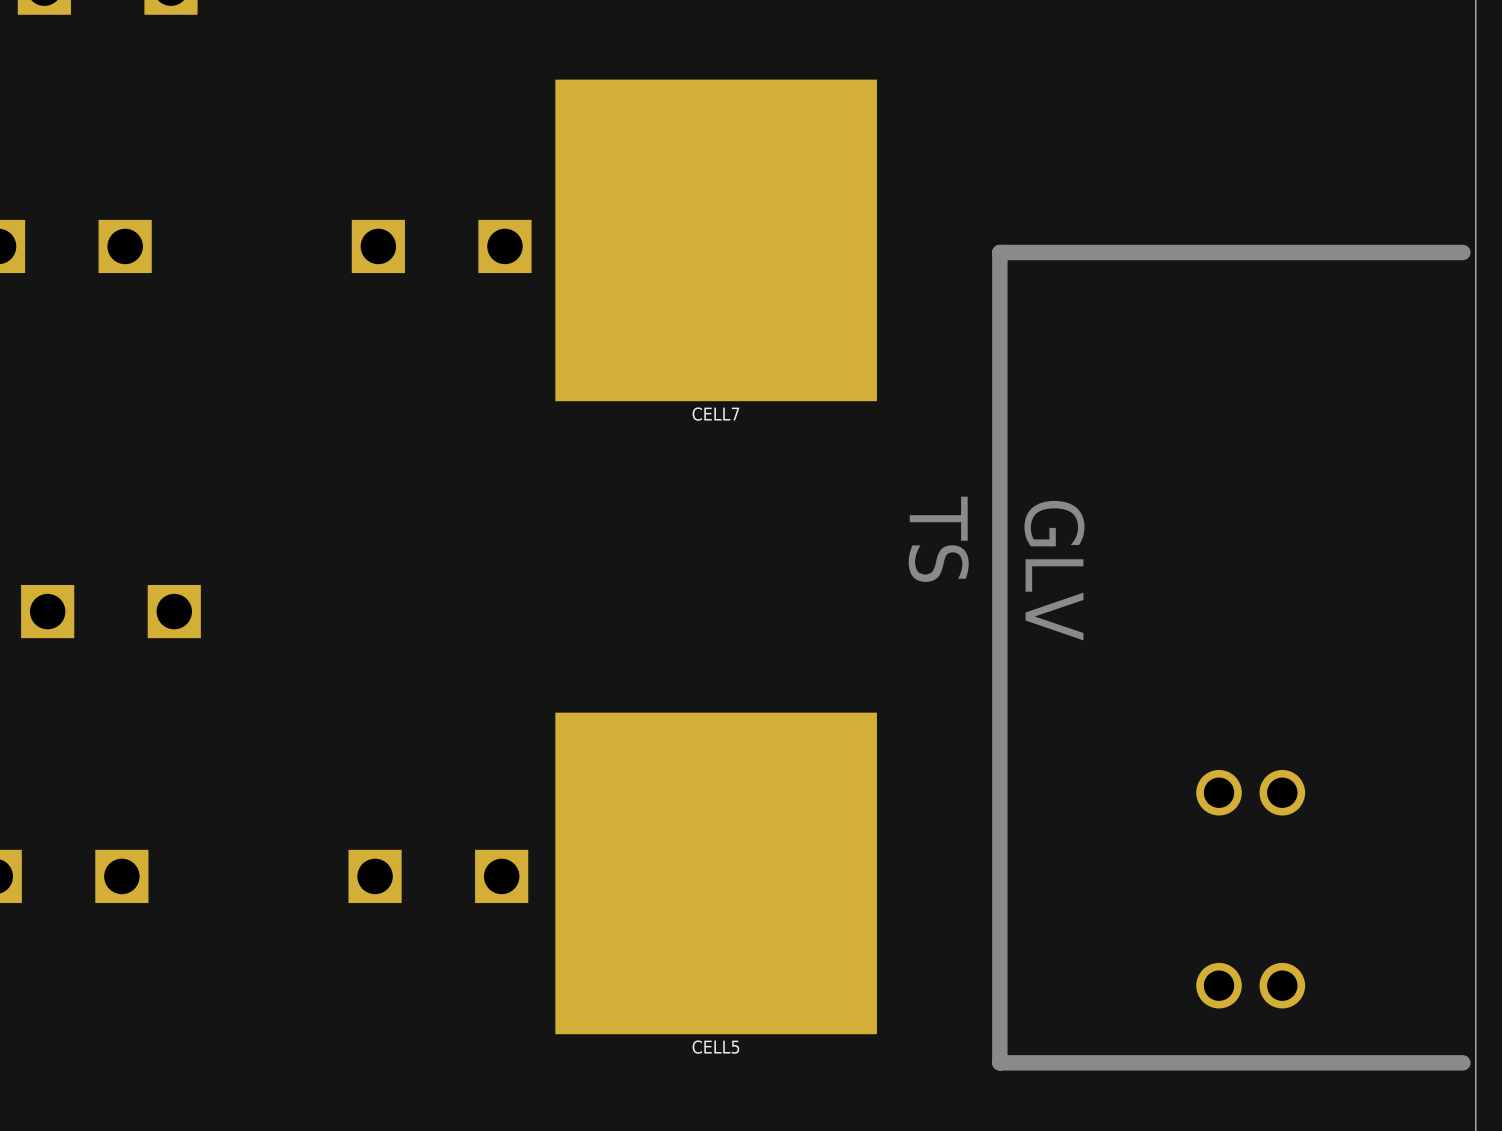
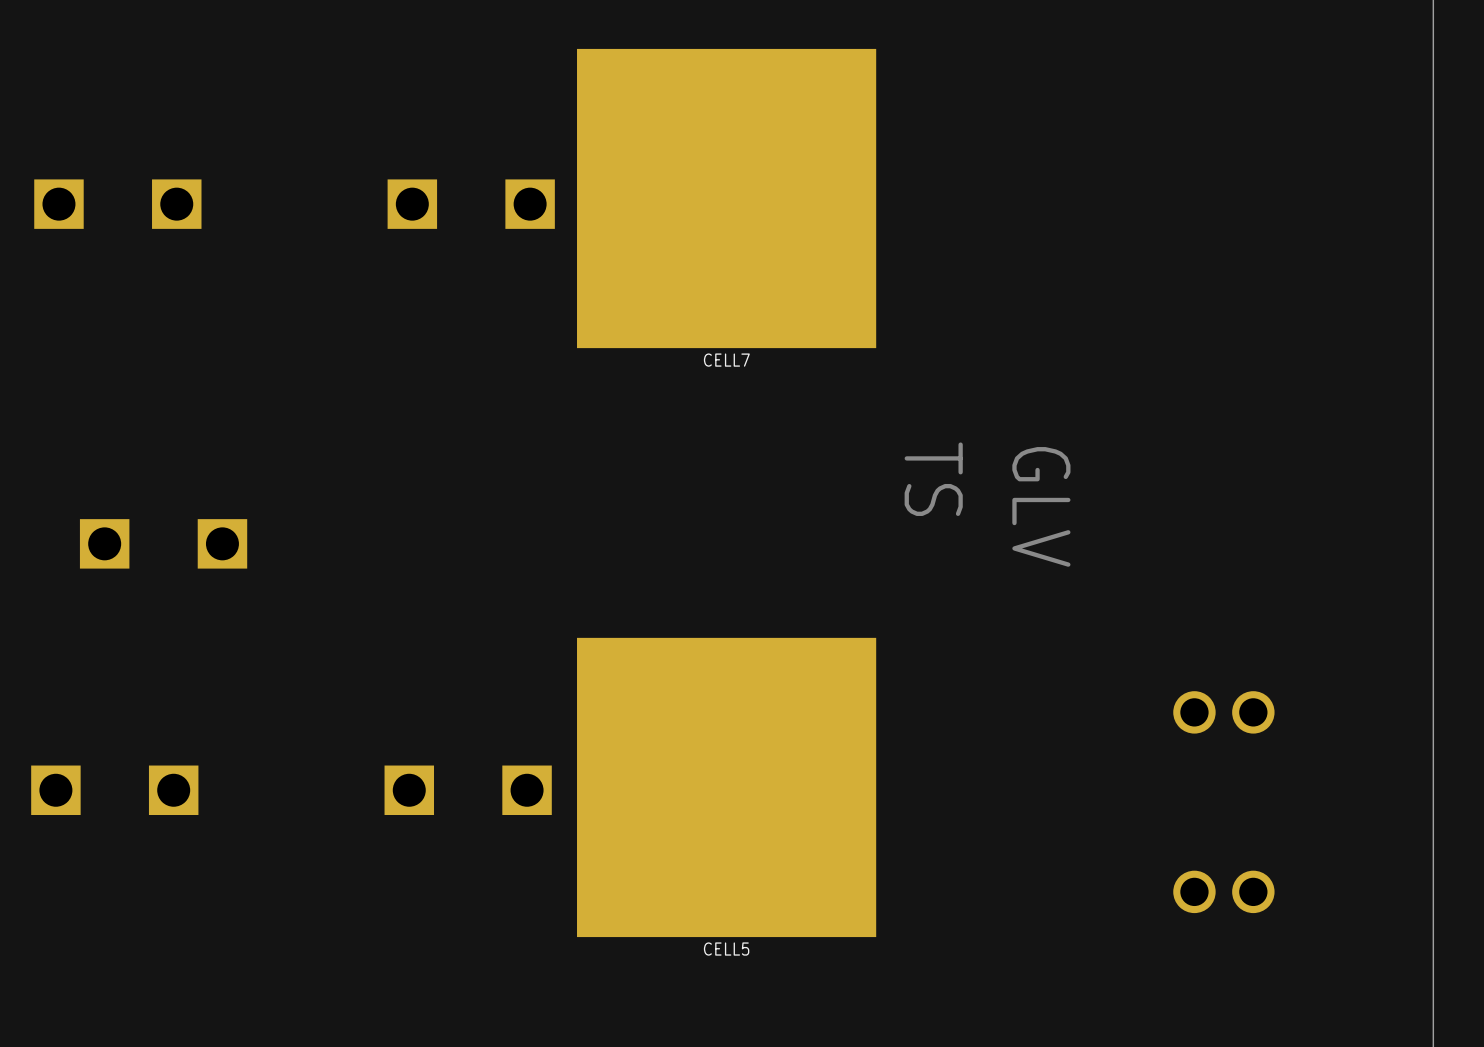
line: (1462, 252) (999, 252) (999, 1062) (1462, 1062) -> none

